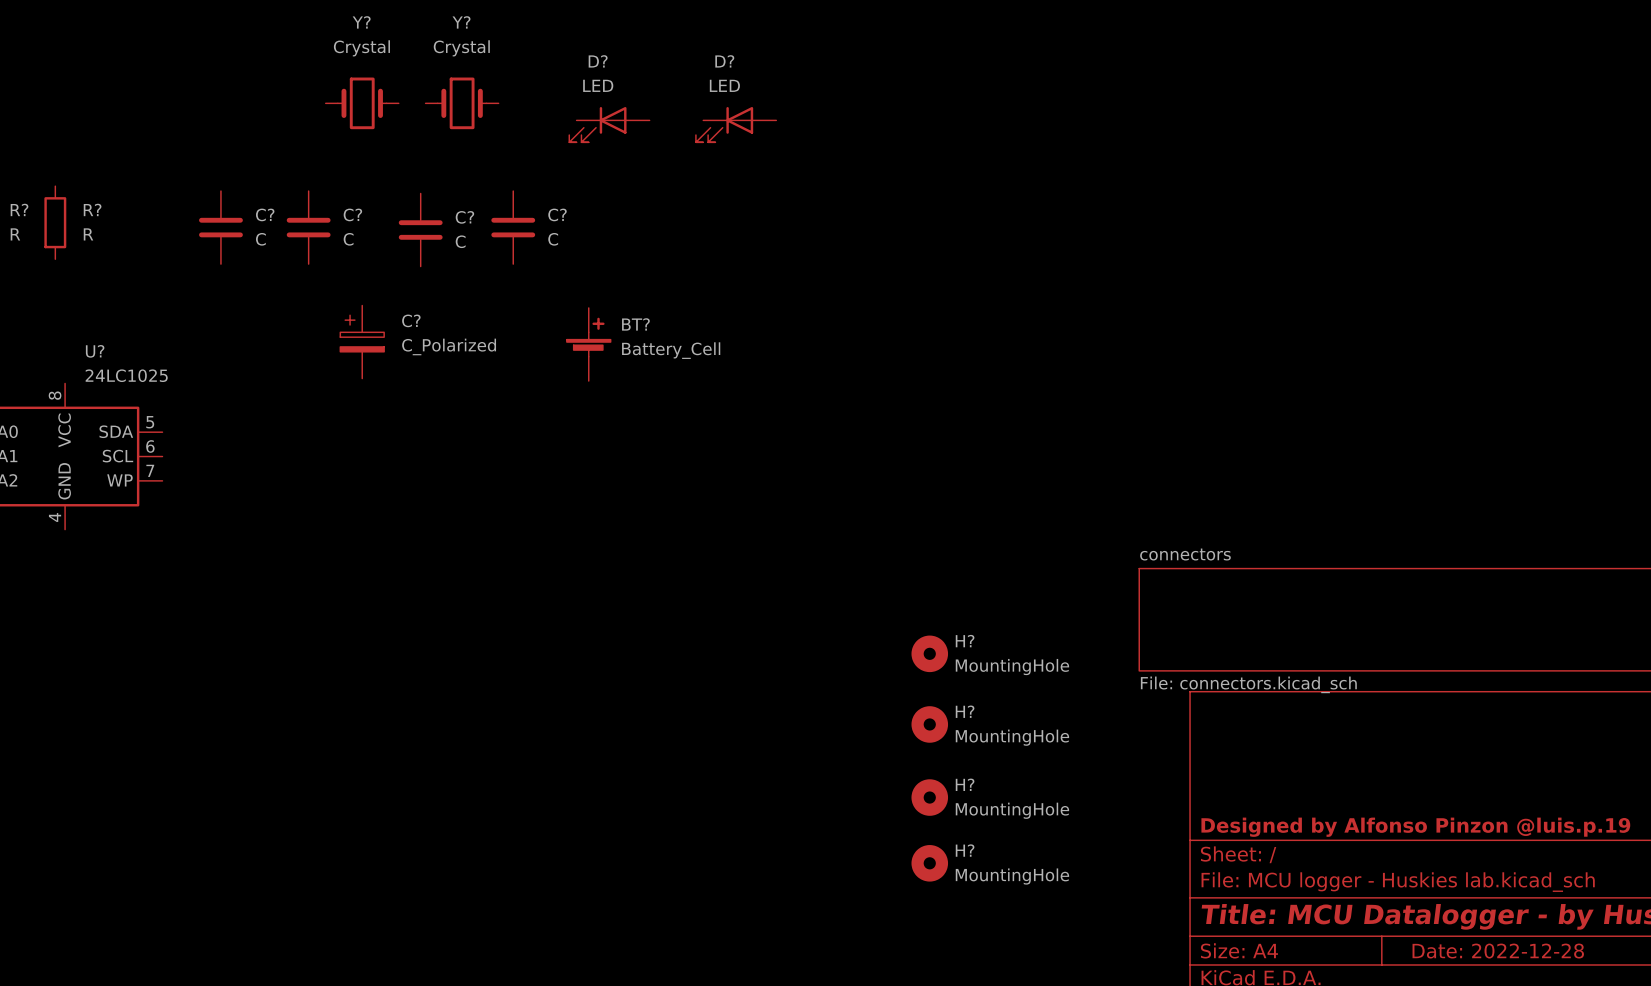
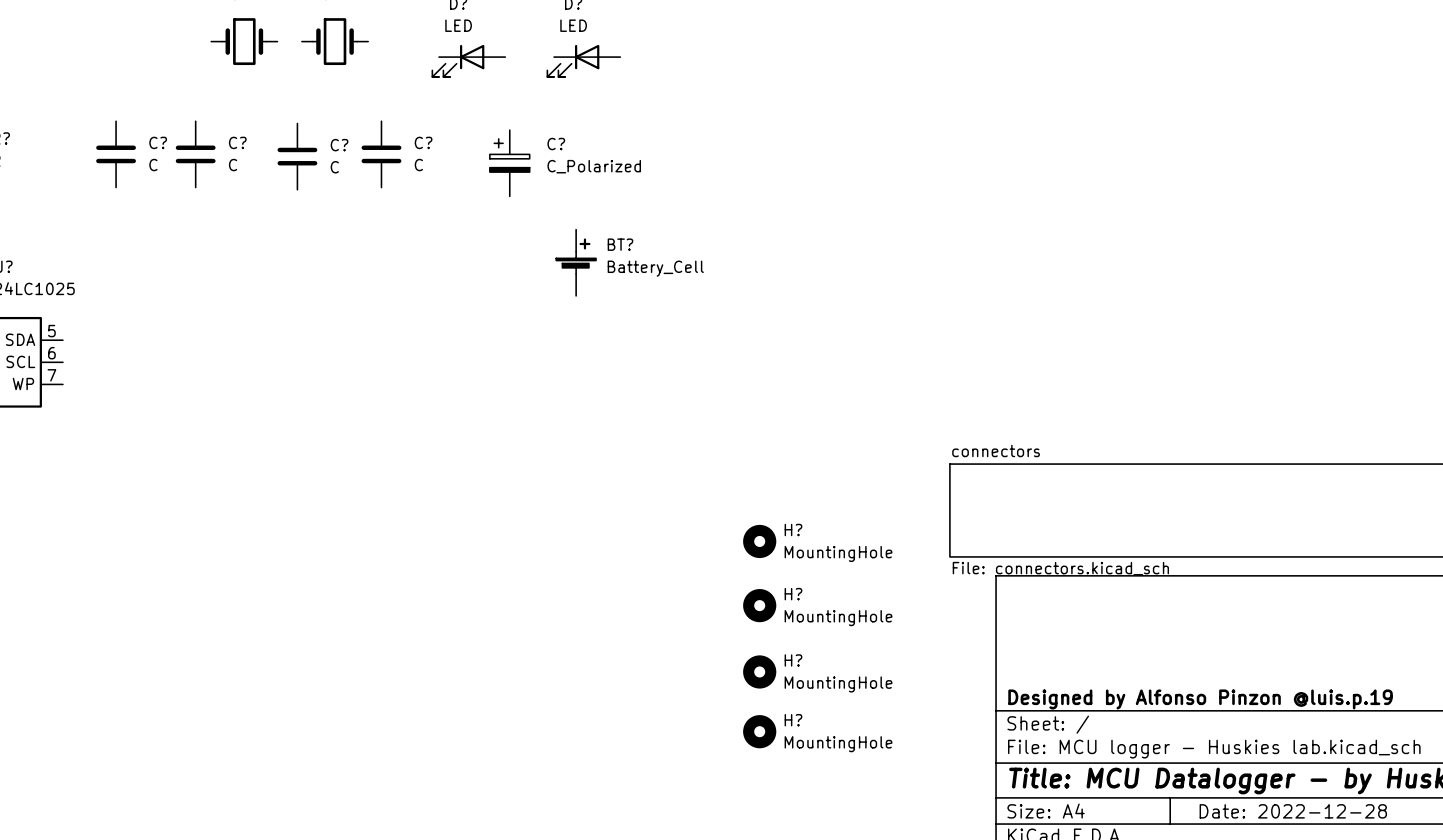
C?: none -> C_Polarized (509, 163)
C?: C_Polarized (362, 342) -> none
BT? position: (588, 344) -> (576, 262)

